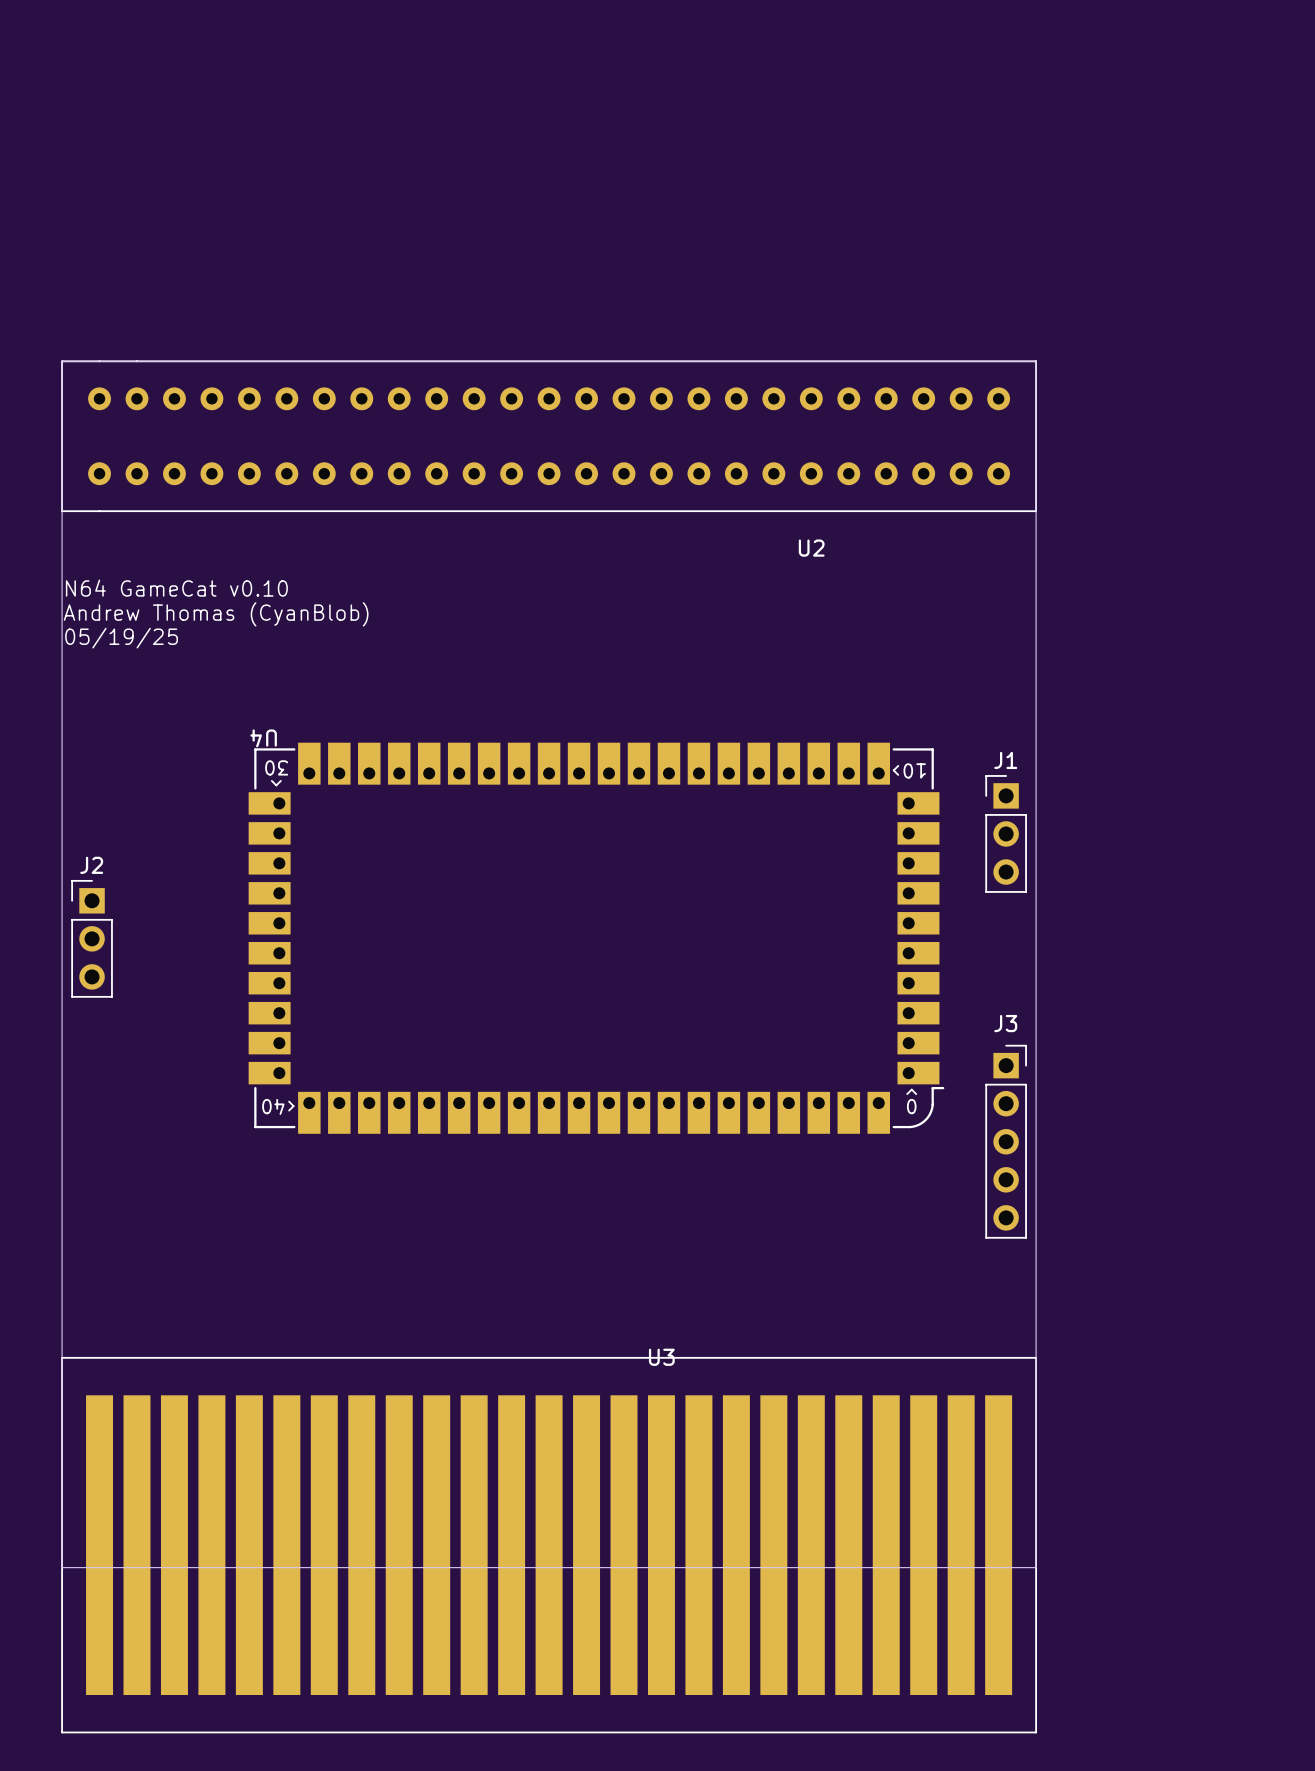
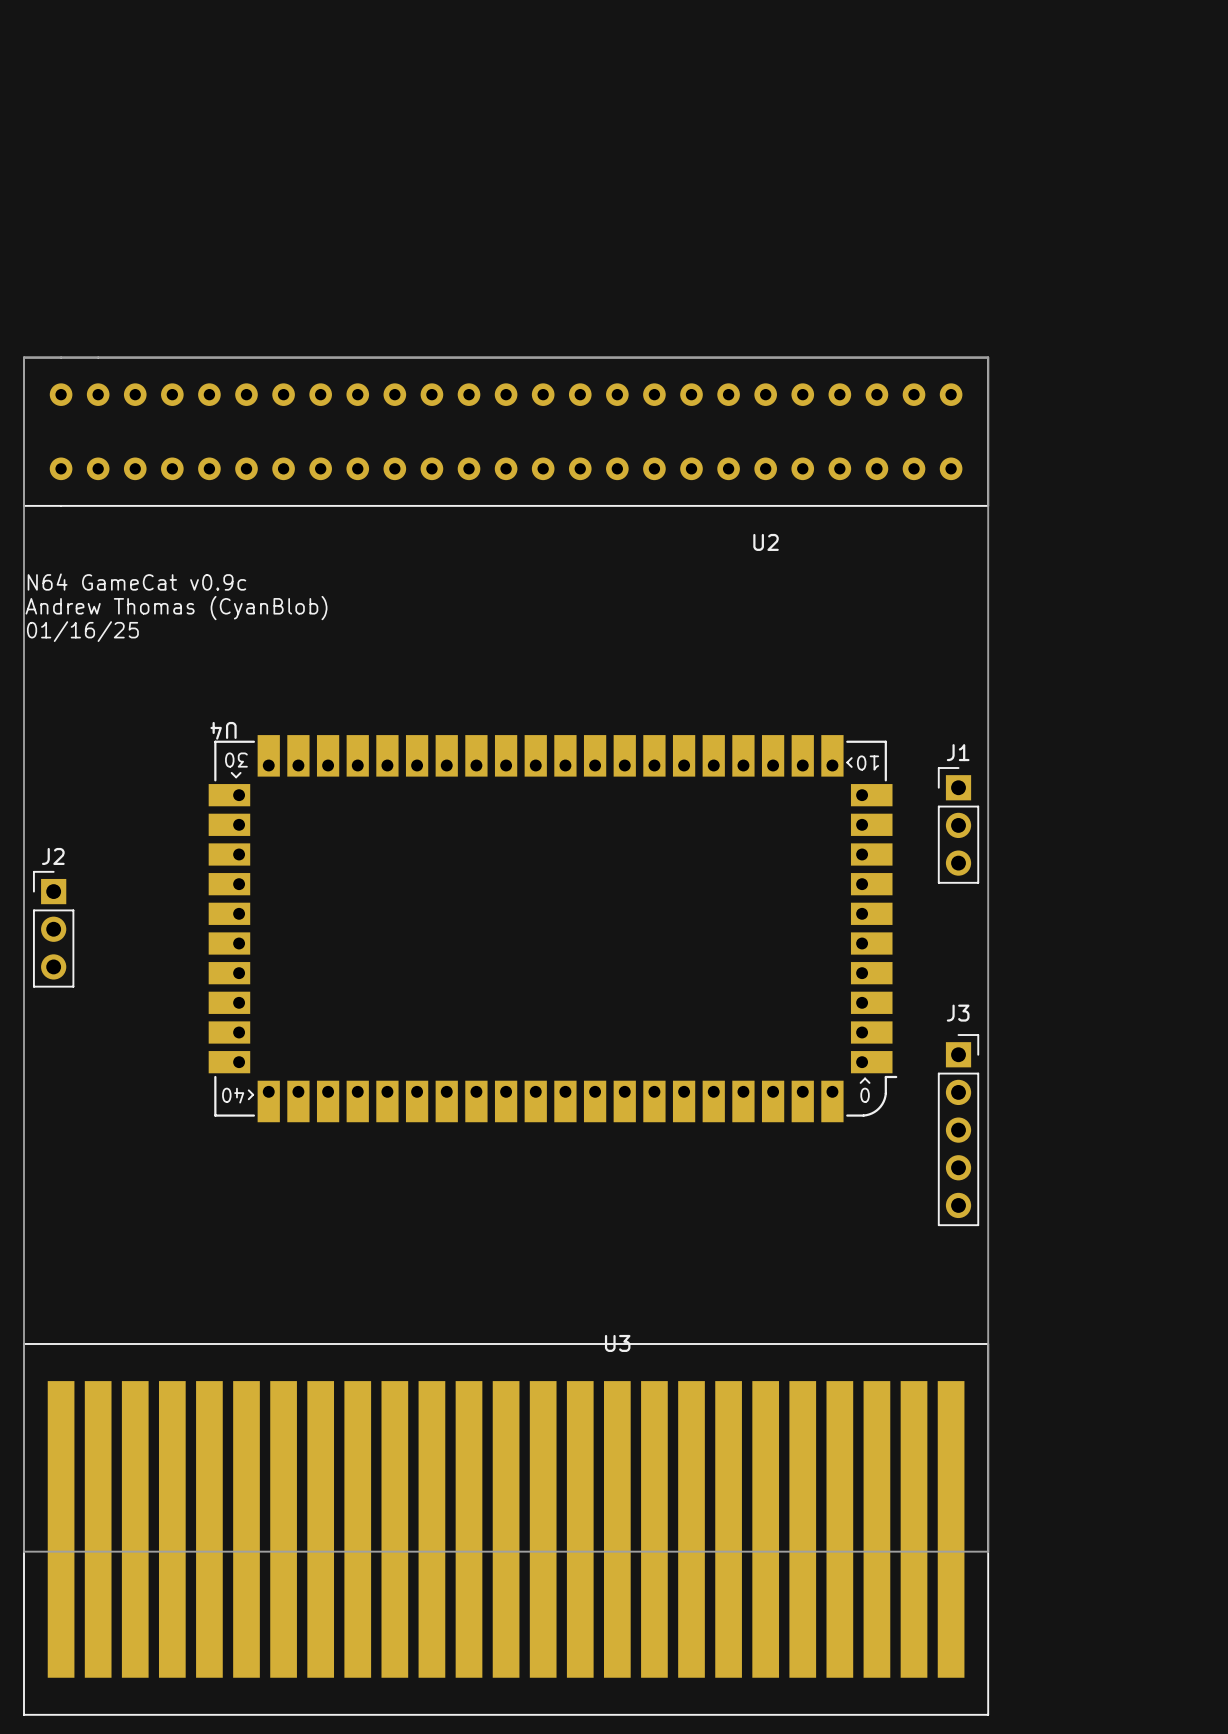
text: N64 GameCat v0.10 (176, 588) -> N64 GameCat v0.9c (136, 582)
text: 05/19/25 (121, 638) -> 01/16/25 (82, 631)

